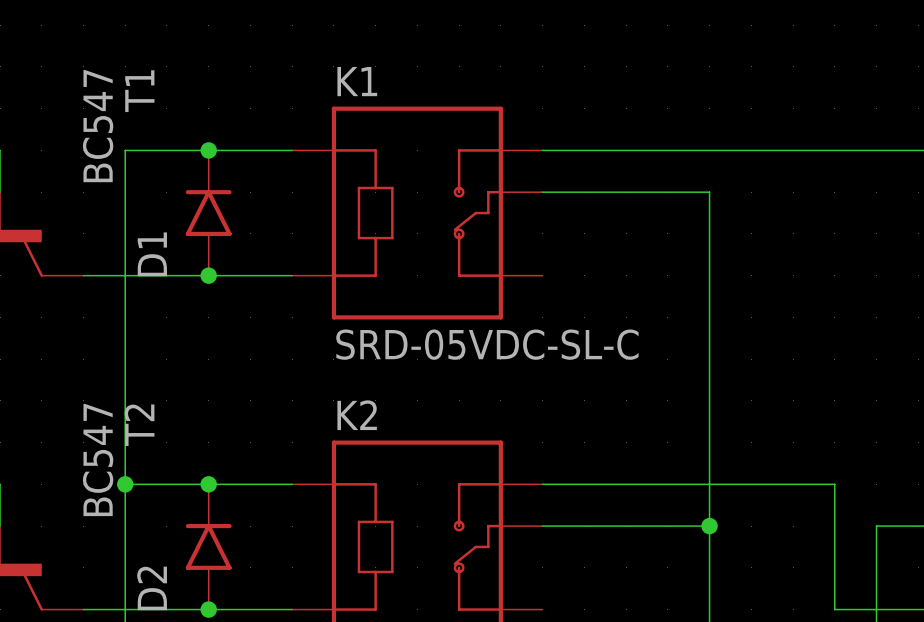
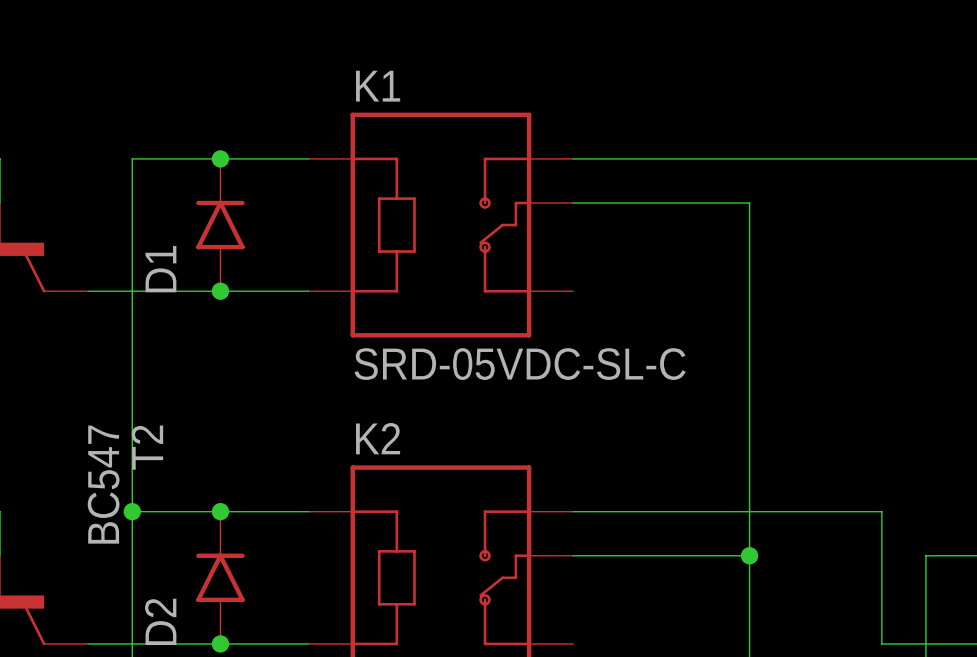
T1 name: T1 (139, 91) -> none
T1 value: BC547 (98, 126) -> none

